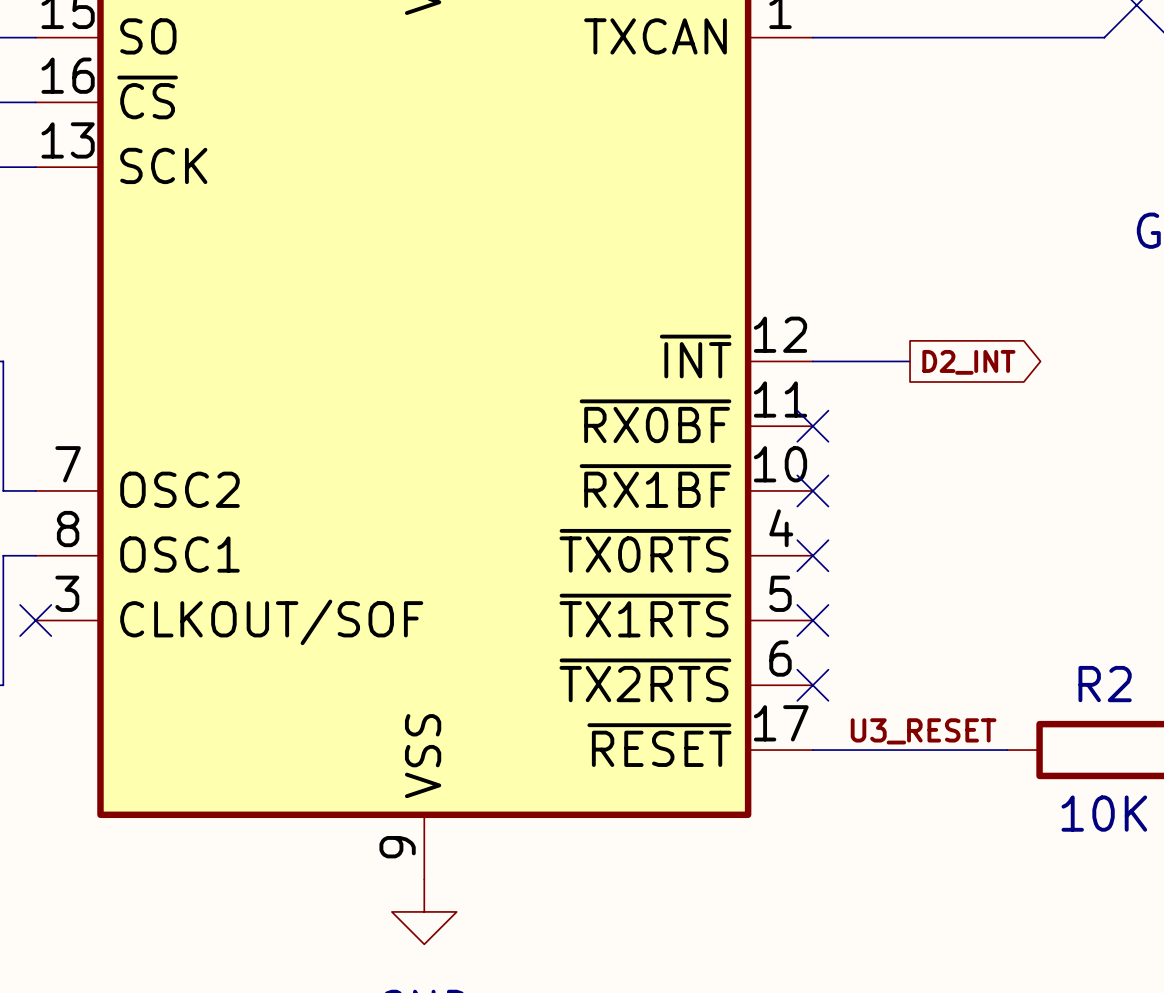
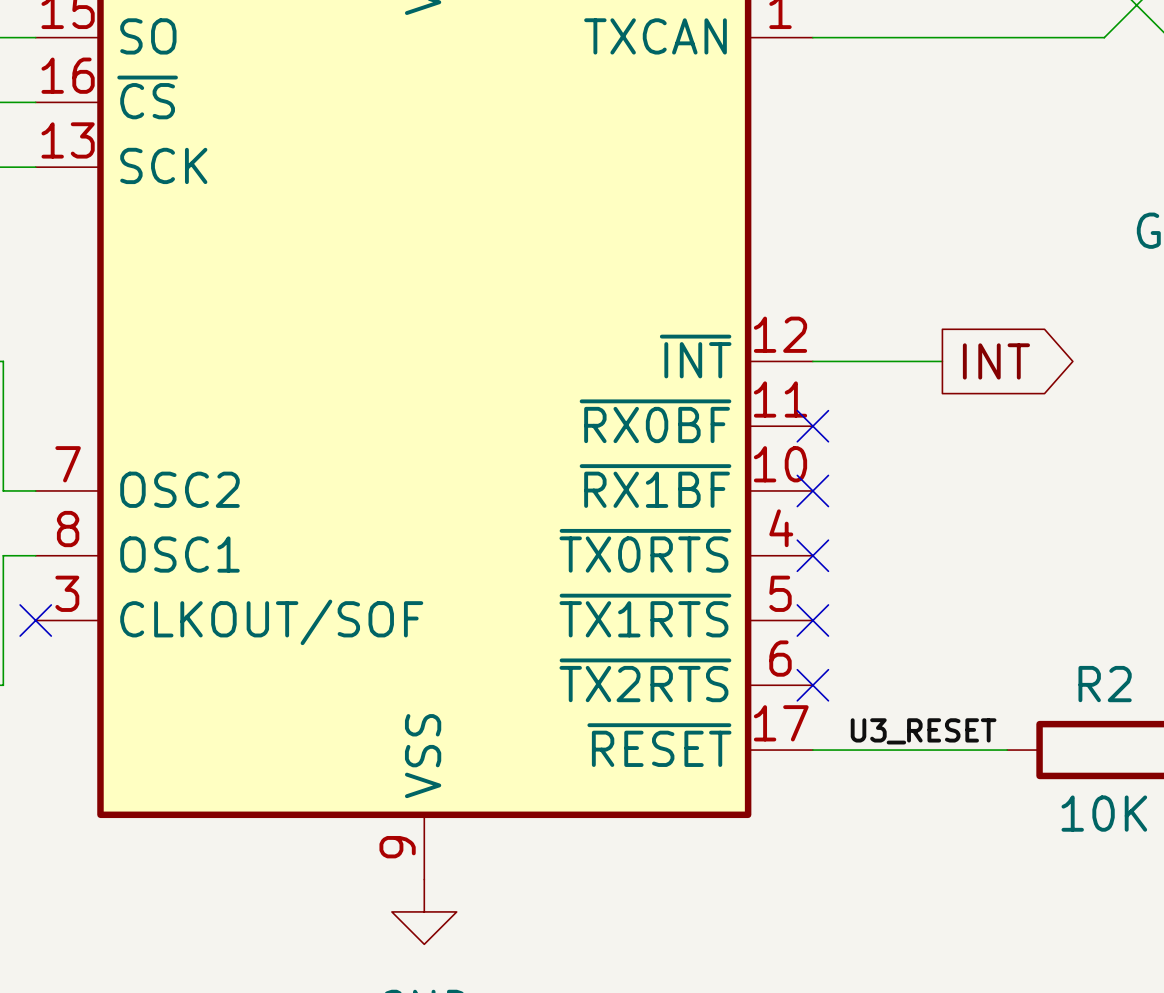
wire: none -> (910, 361) (942, 361)
global label: D2_INT (968, 362) -> INT (996, 361)

